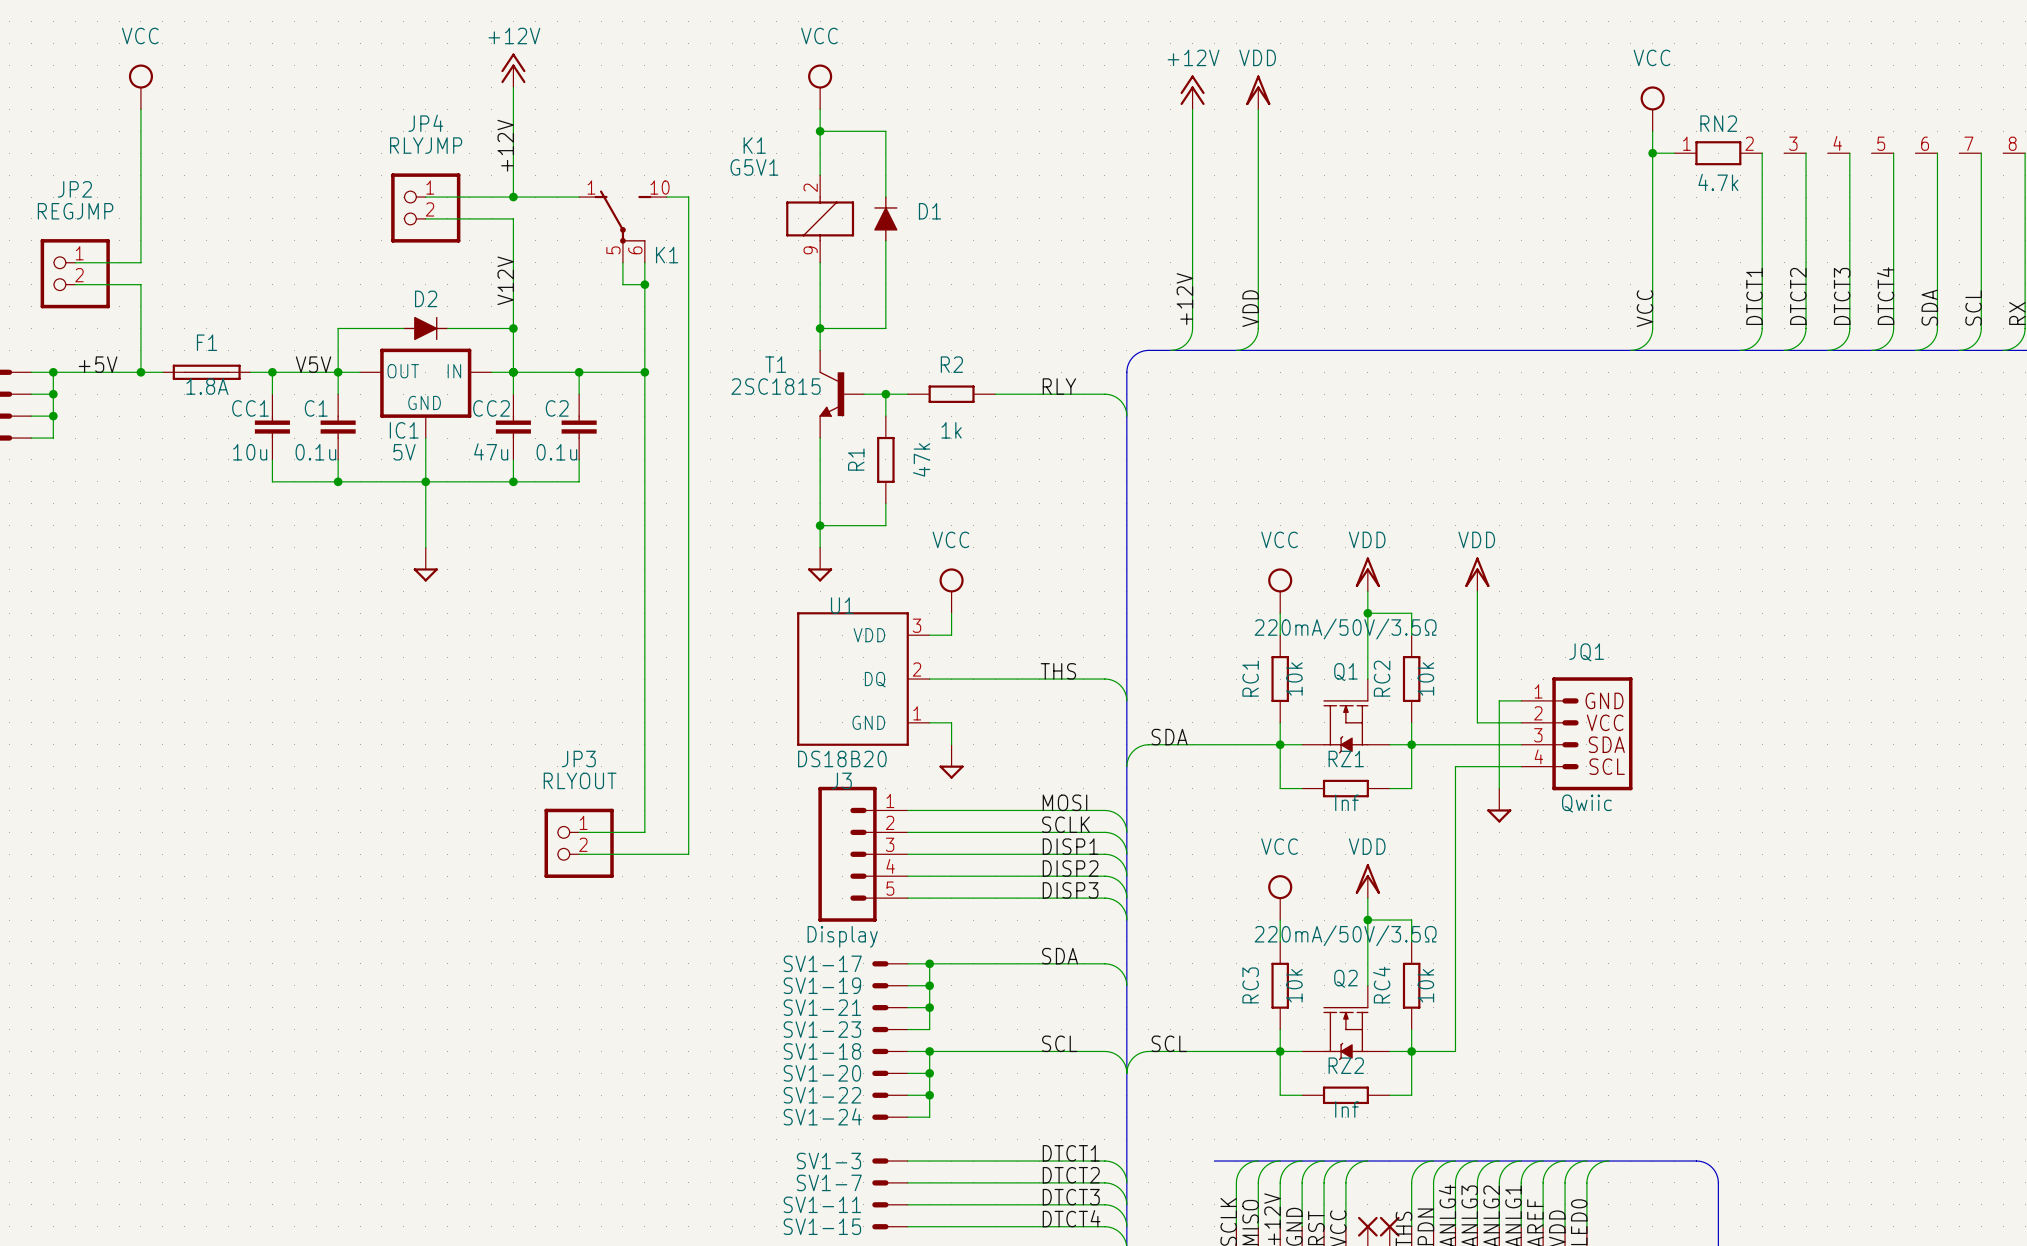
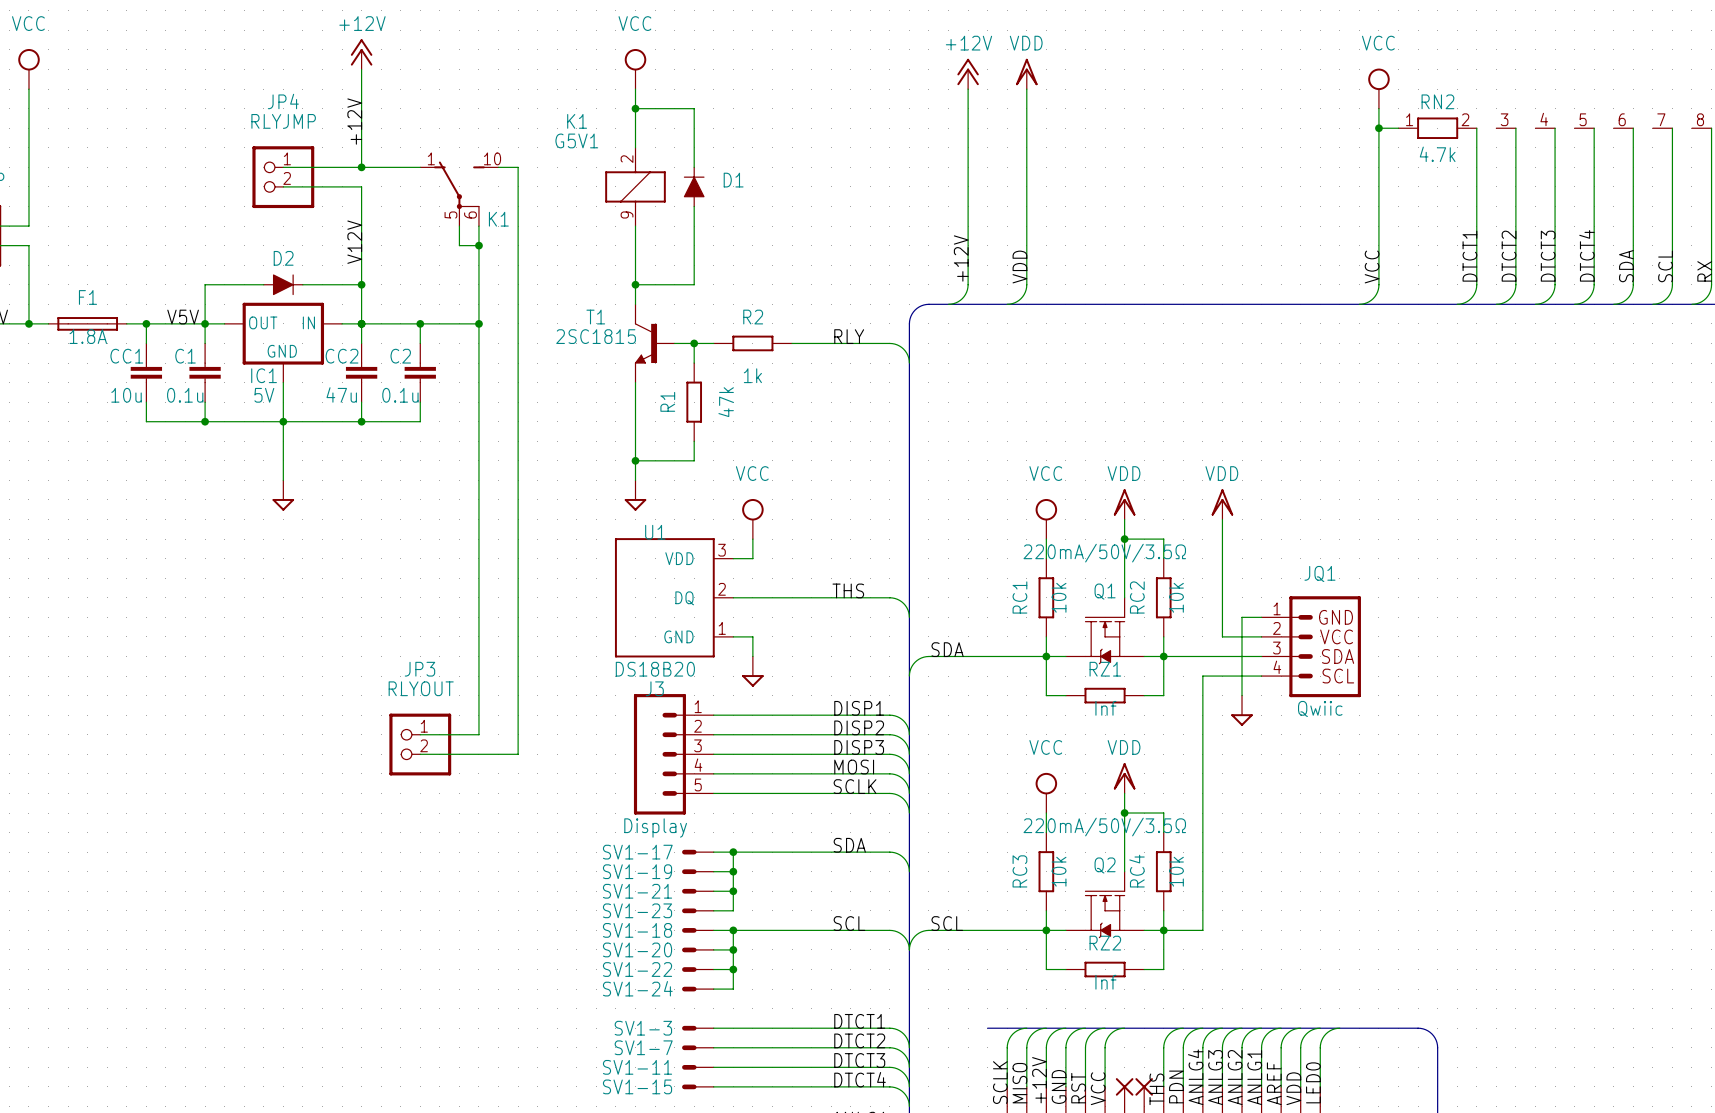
label: MOSI (1064, 802) -> DISP1 (859, 708)
label: SCLK (1065, 824) -> DISP2 (859, 727)
label: DISP1 (1070, 846) -> DISP3 (859, 747)
label: DISP2 (1070, 868) -> MOSI (854, 767)
label: DISP3 (1070, 890) -> SCLK (855, 786)

